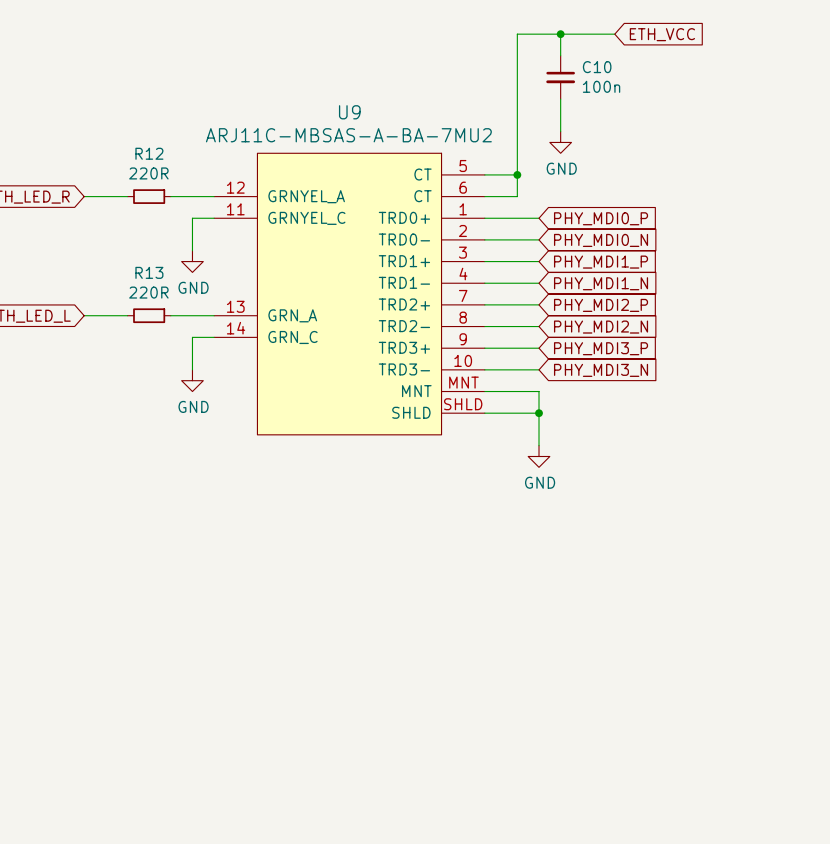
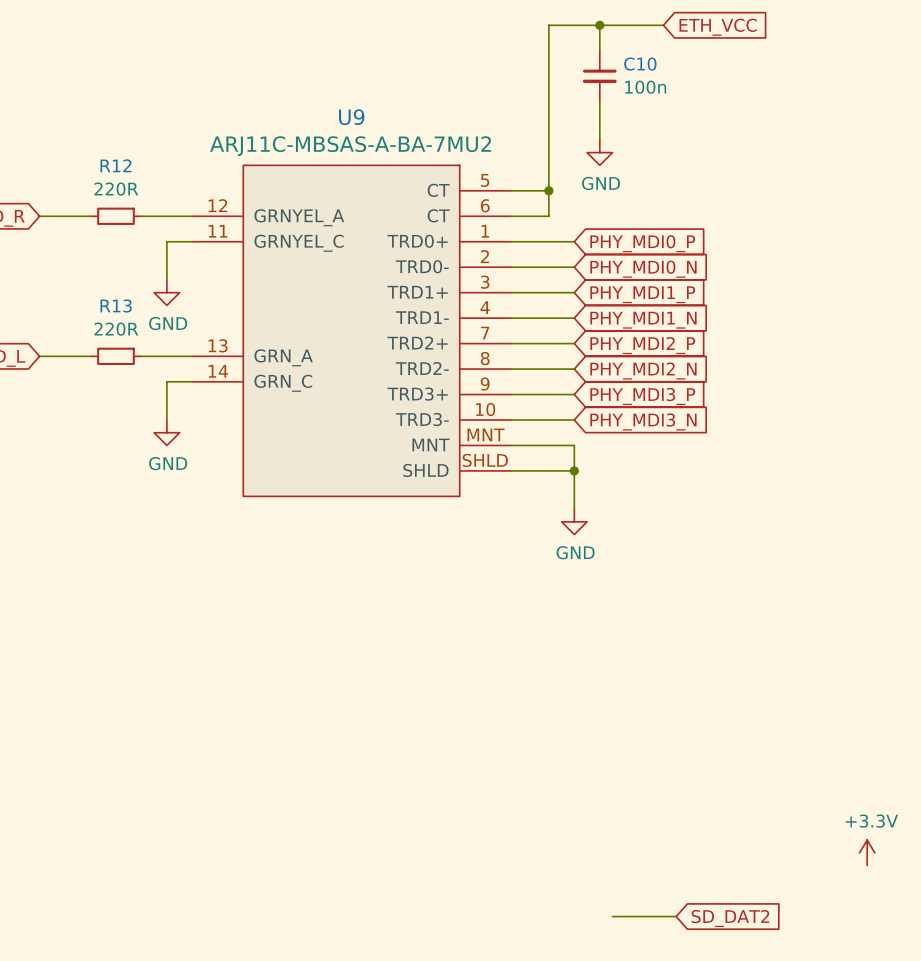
power symbol: none -> +3.3V (867, 852)
wire: none -> (612, 916) (676, 916)
global label: none -> SD_DAT2 (730, 918)

